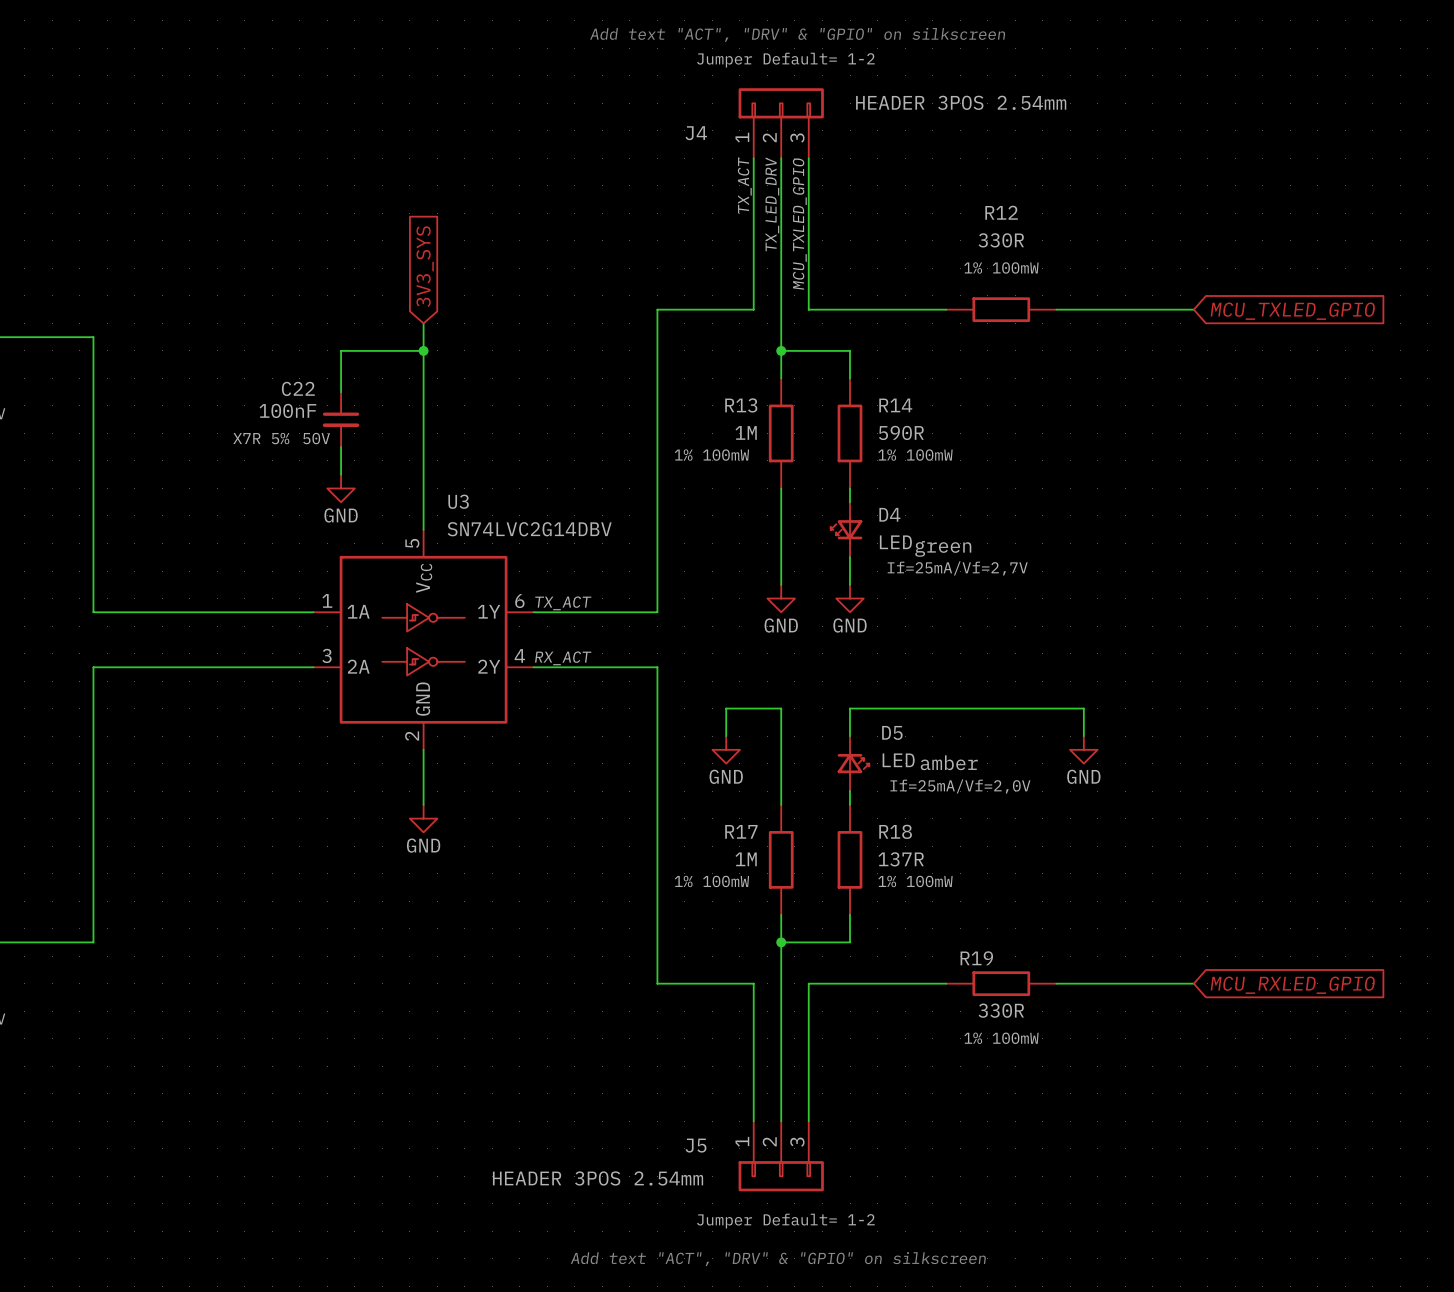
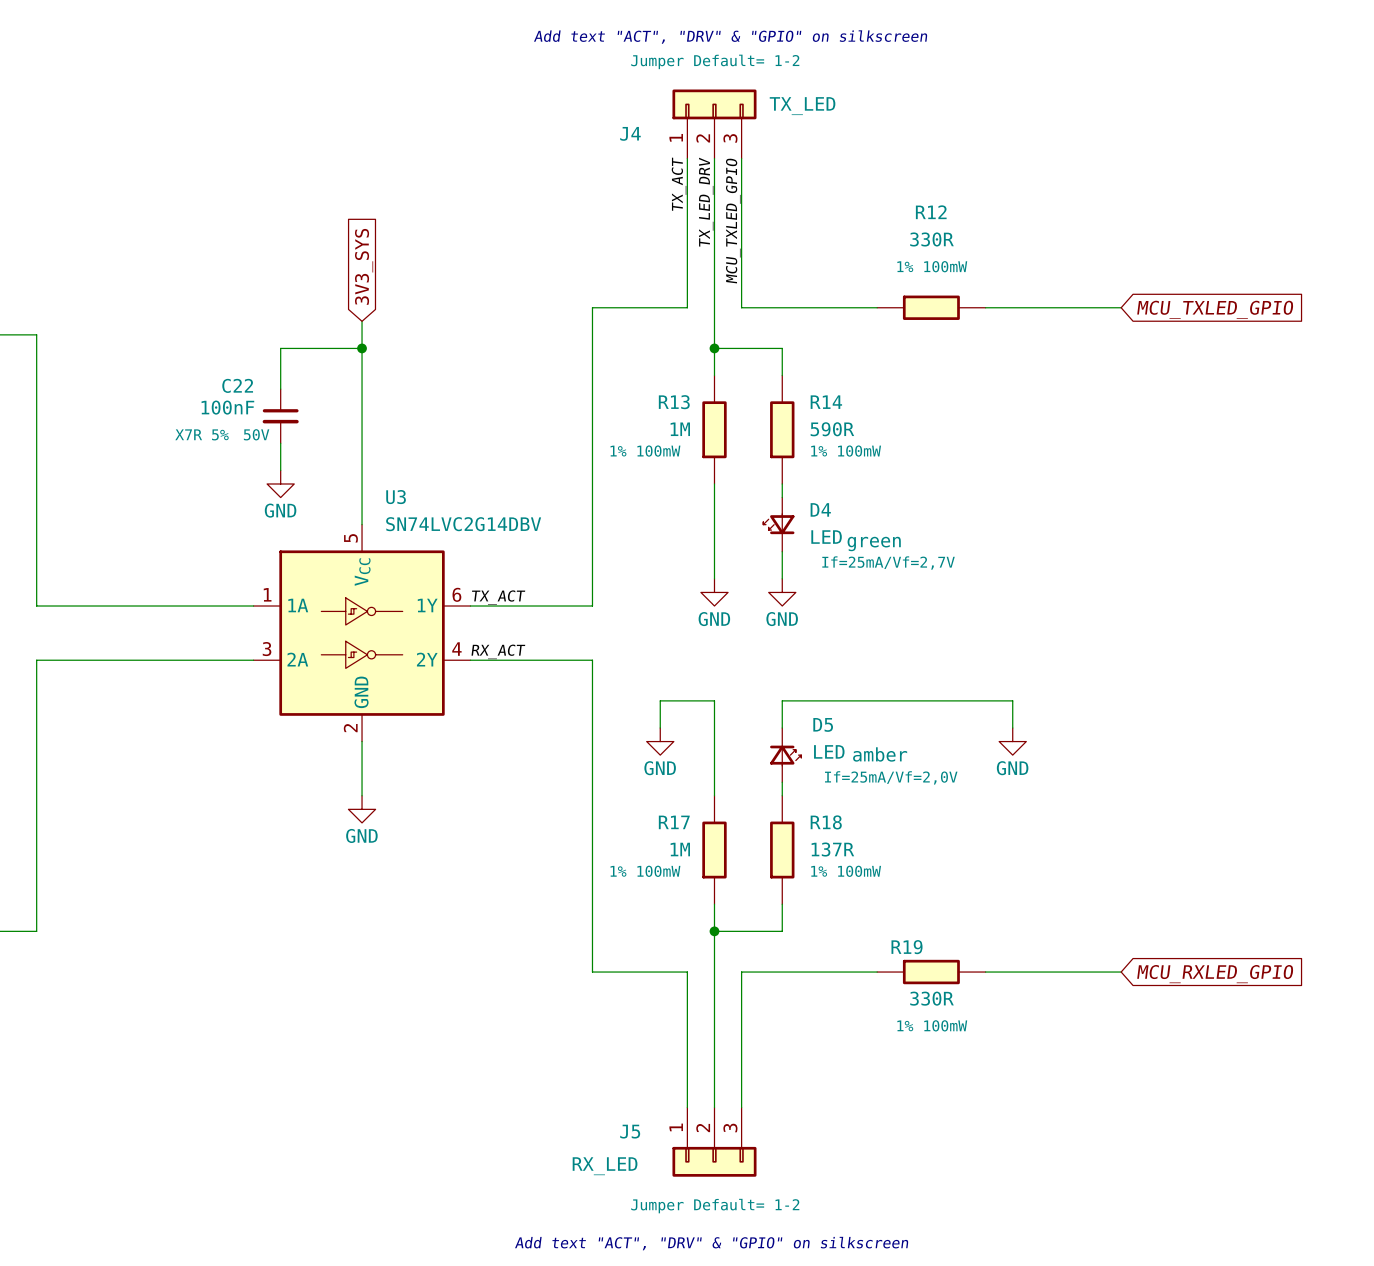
J4 value: HEADER 3POS 2.54mm (961, 102) -> TX_LED (802, 106)
J5 value: HEADER 3POS 2.54mm (598, 1178) -> RX_LED (605, 1166)

